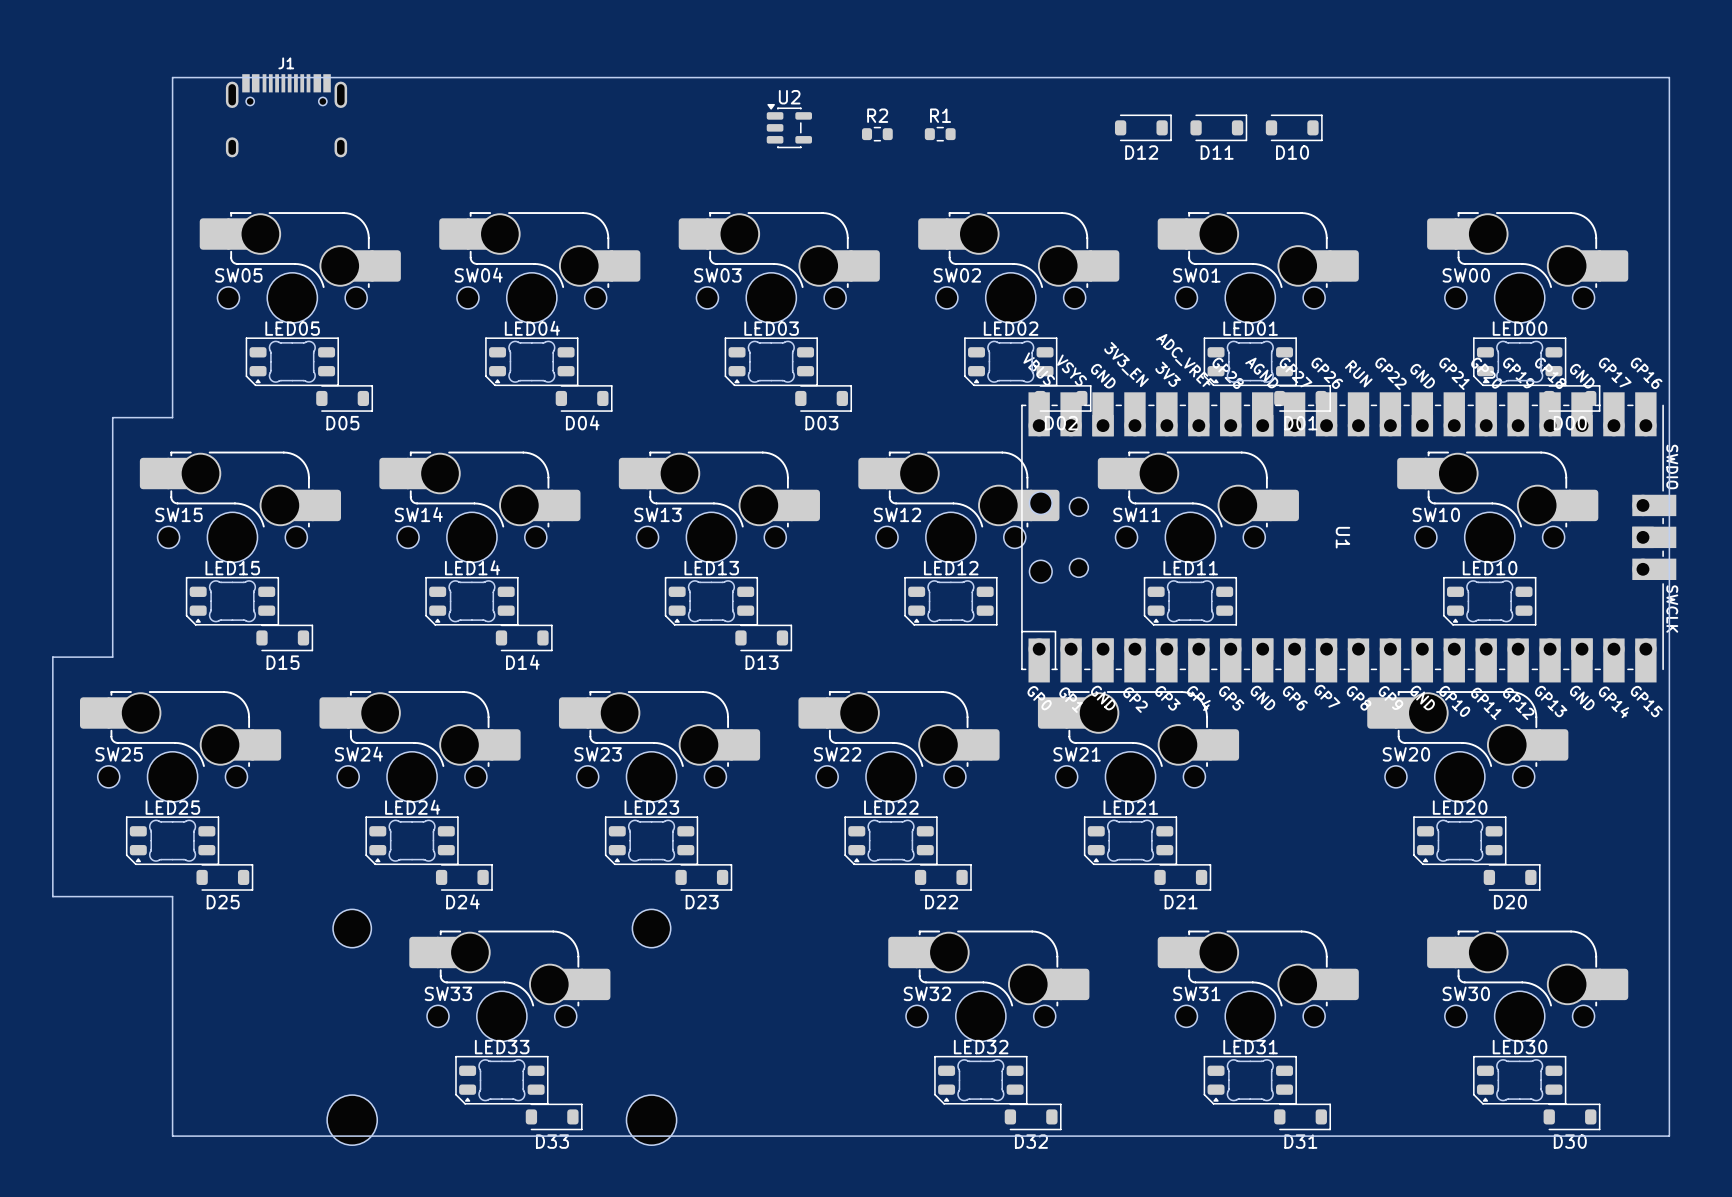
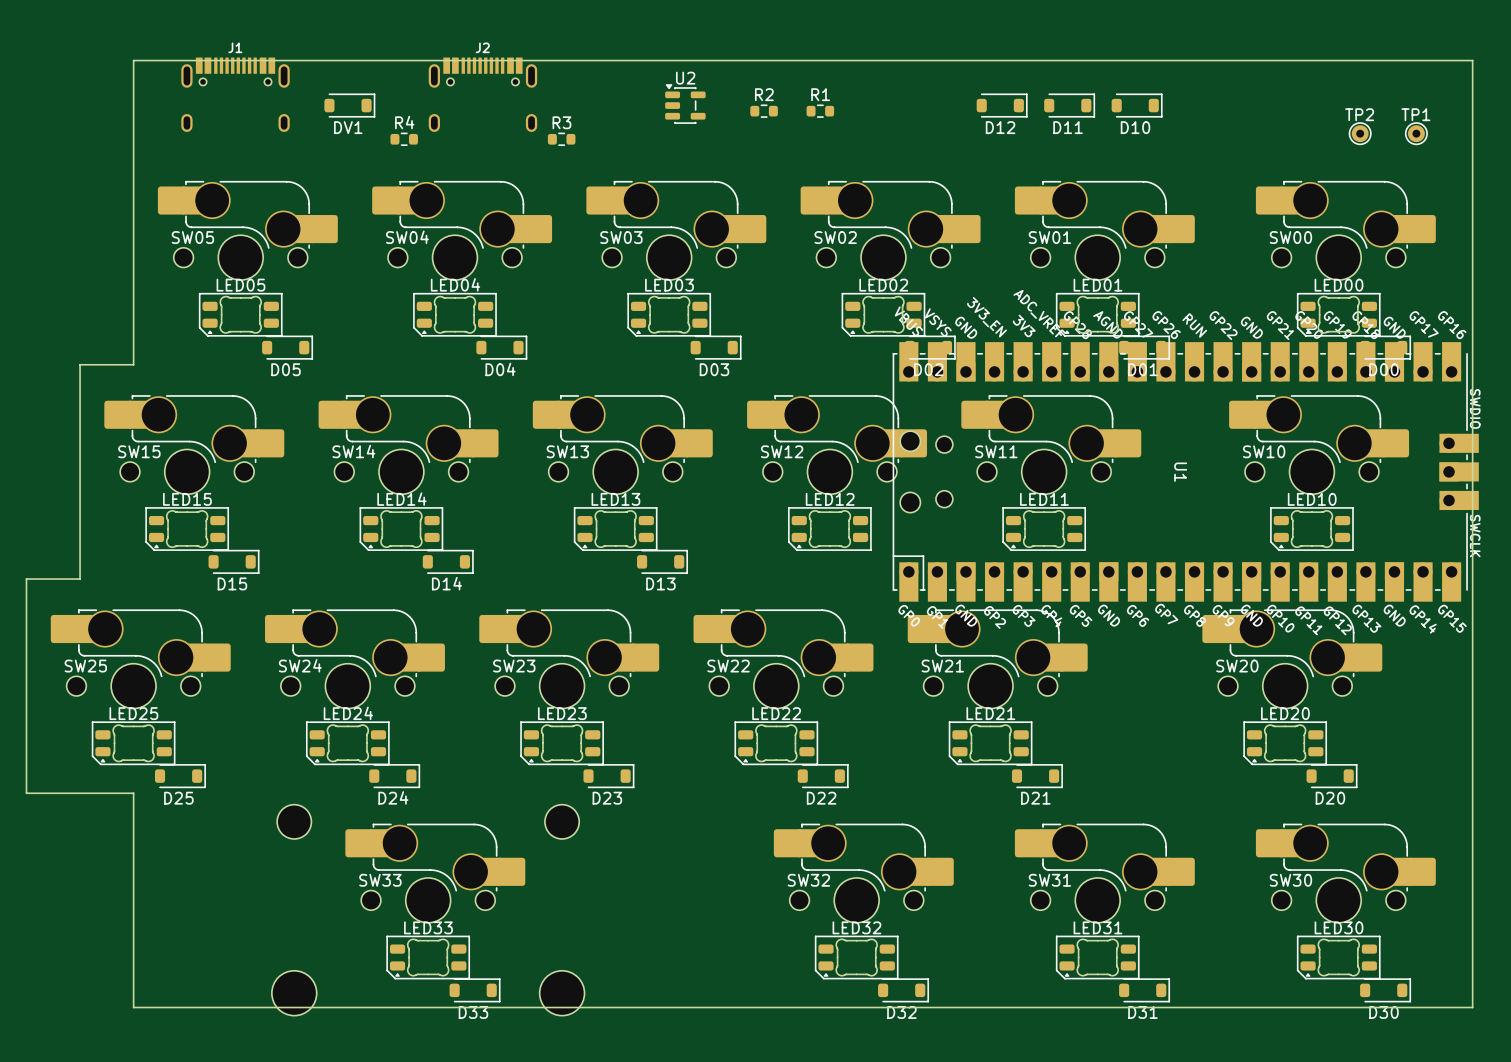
J2: none -> (482, 94)
DV1: none -> (349, 105)
TP2: none -> (1360, 133)
TP1: none -> (1416, 133)
R4: none -> (404, 139)
R3: none -> (561, 139)

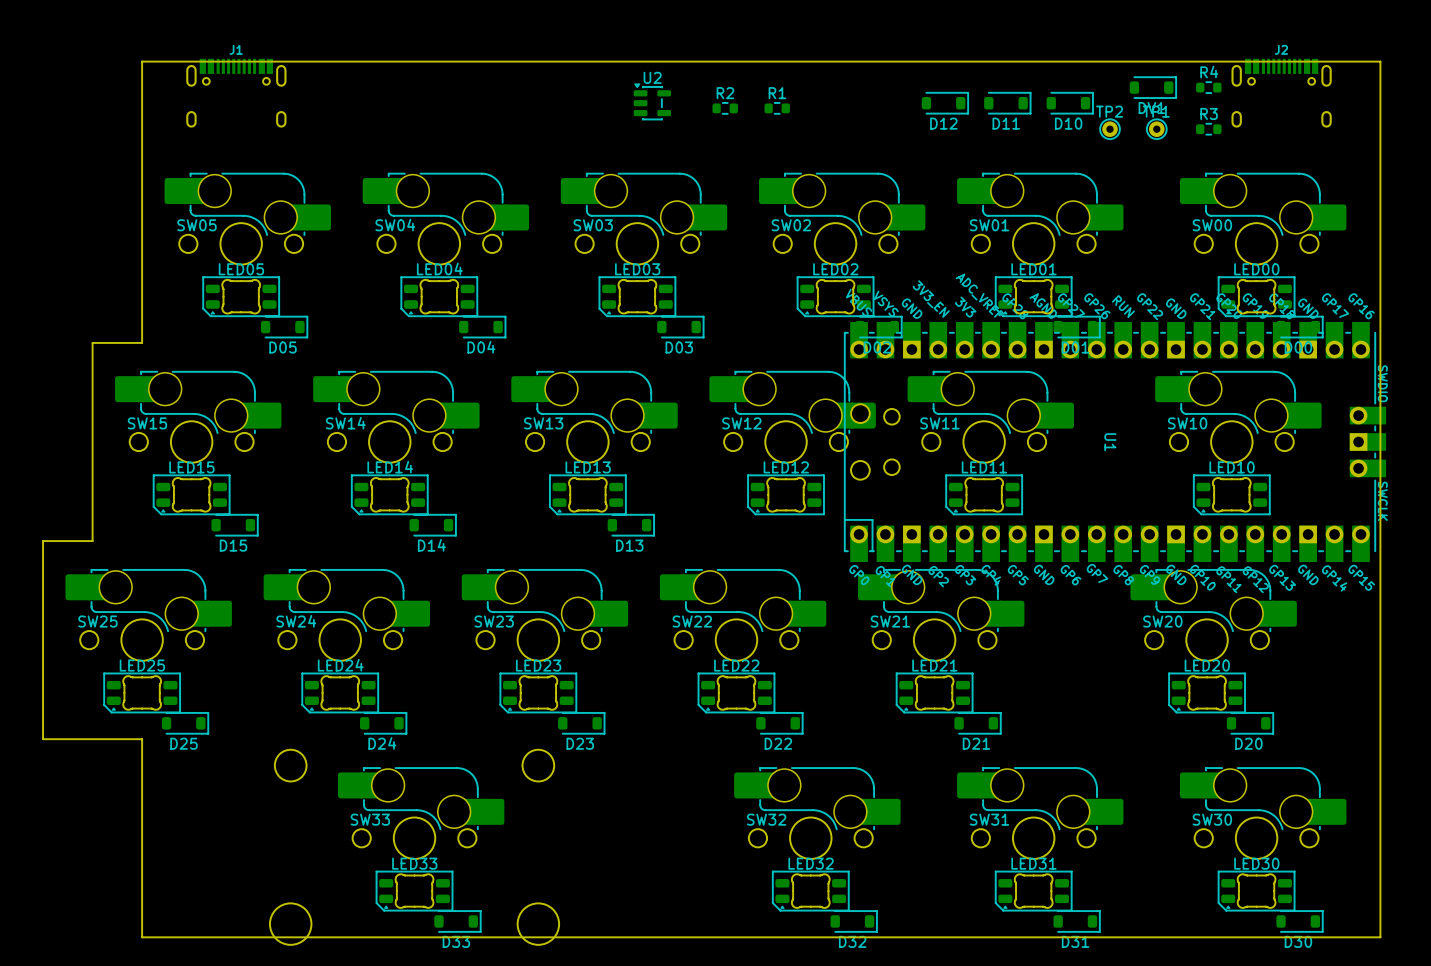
J2 position: (482, 94) -> (1281, 93)
DV1 position: (349, 105) -> (1153, 87)
TP2 position: (1360, 133) -> (1110, 129)
TP1 position: (1416, 133) -> (1156, 129)
R4 position: (404, 139) -> (1208, 87)
R3 position: (561, 139) -> (1208, 129)

